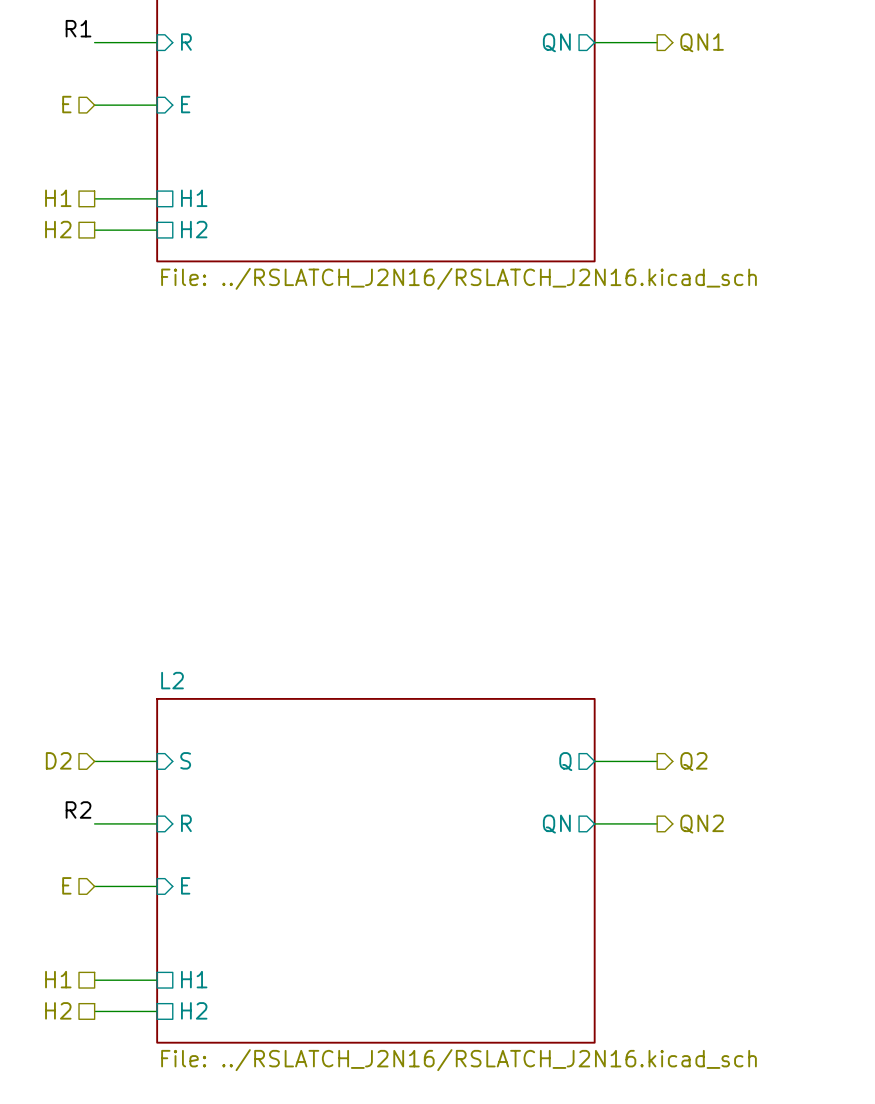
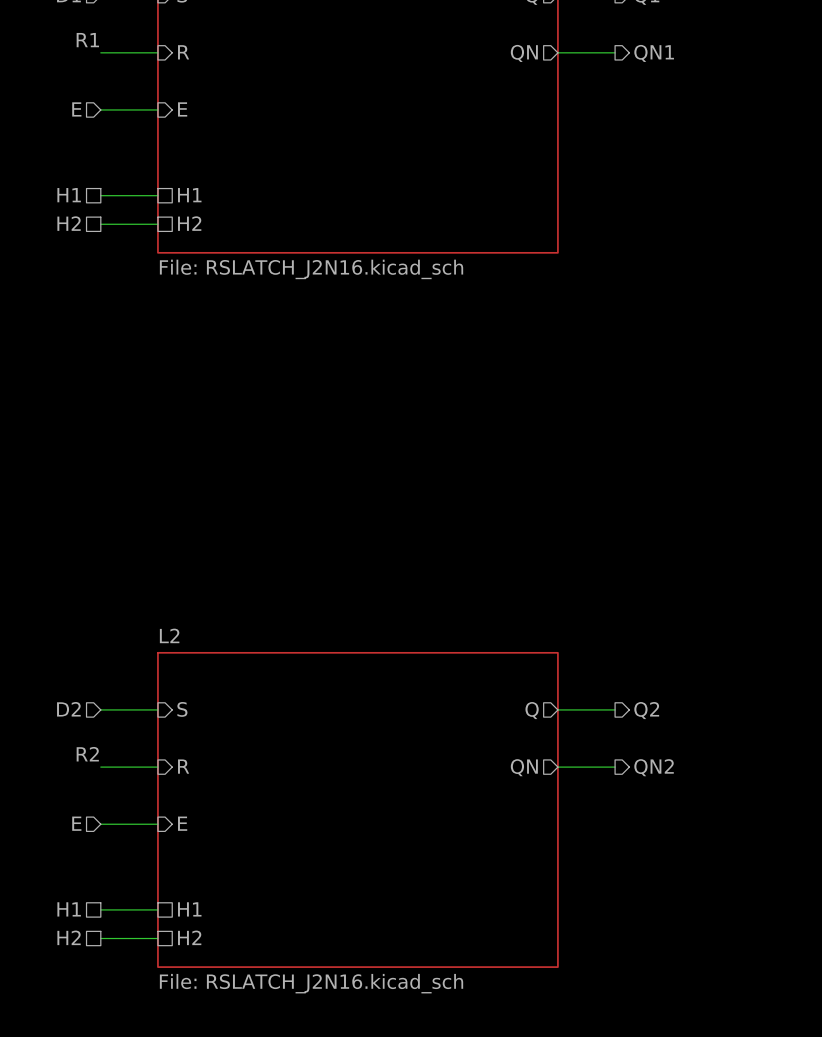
sheet value: File: ../RSLATCH_J2N16/RSLATCH_J2N16.kicad_sch (458, 278) -> File: RSLATCH_J2N16.kicad_sch (311, 269)
sheet L2 value: File: ../RSLATCH_J2N16/RSLATCH_J2N16.kicad_sch (458, 1060) -> File: RSLATCH_J2N16.kicad_sch (311, 983)

